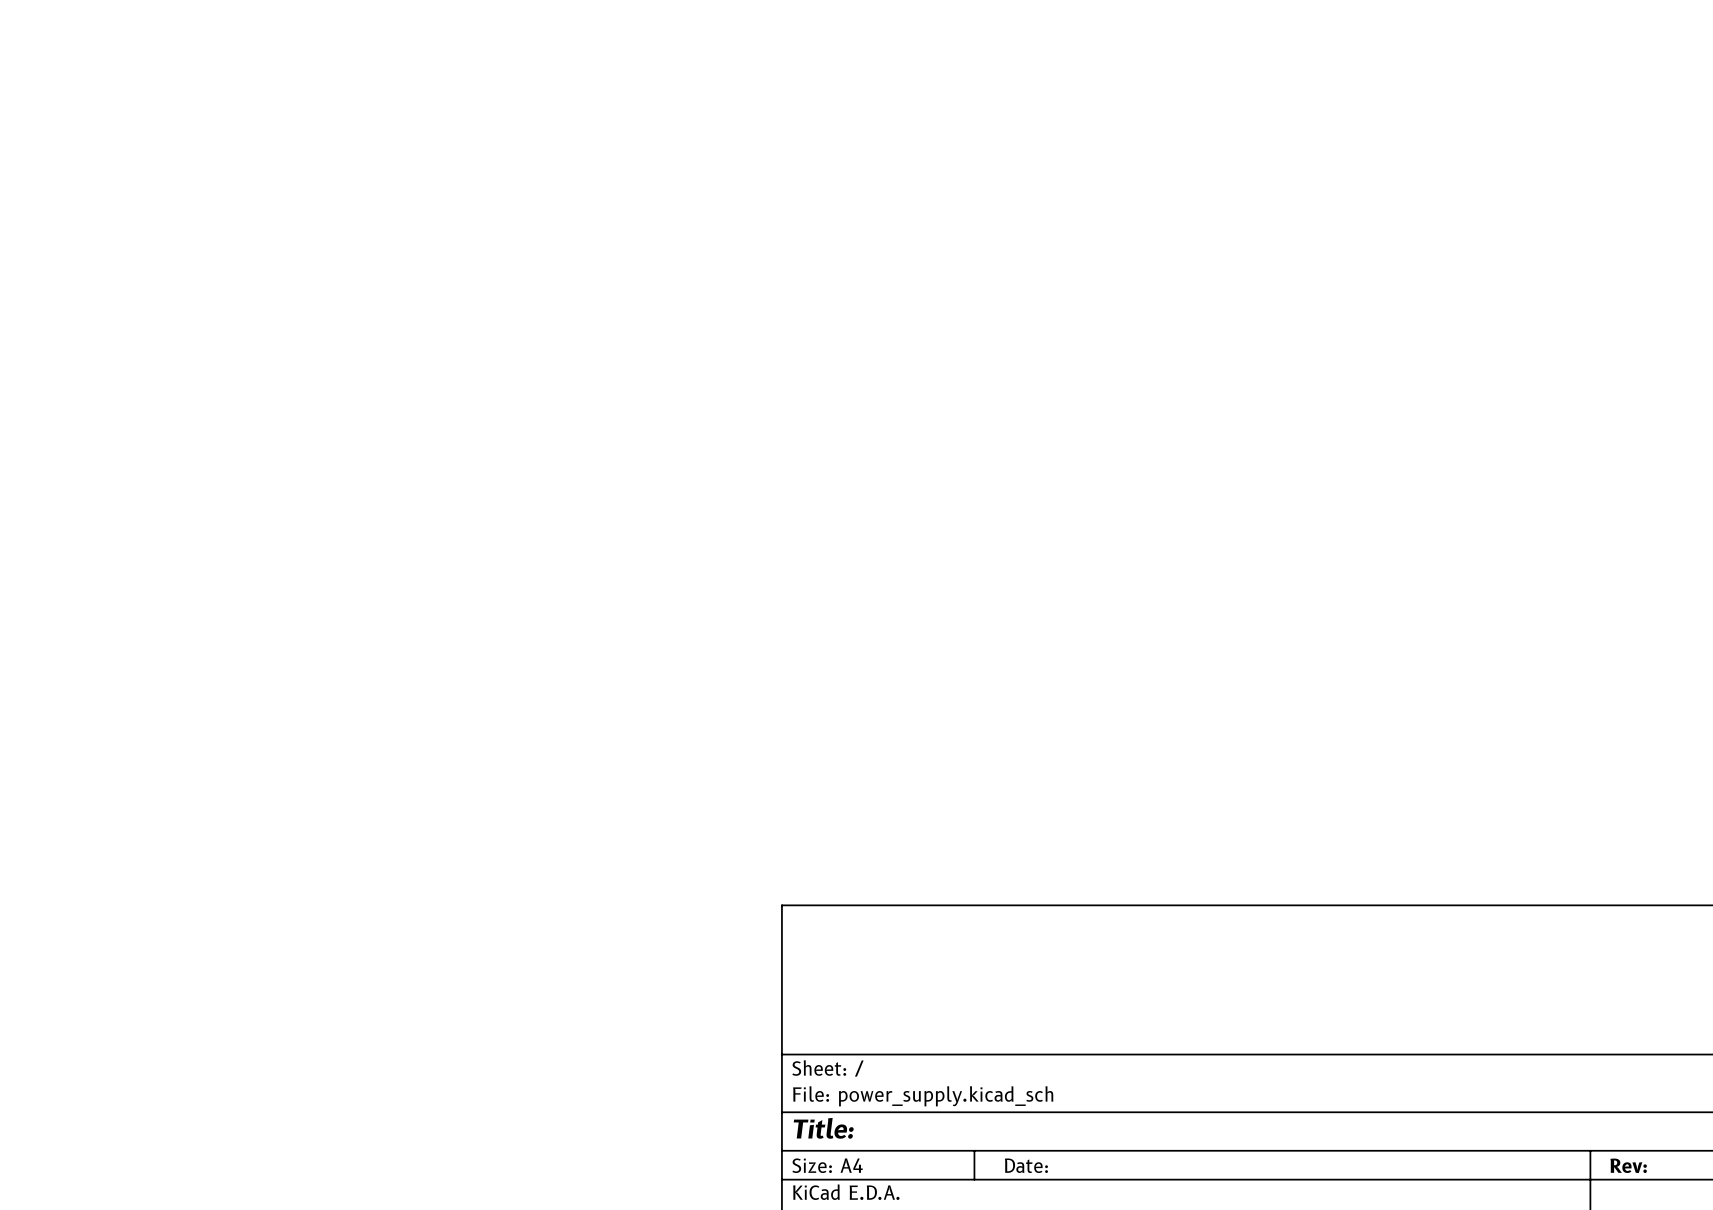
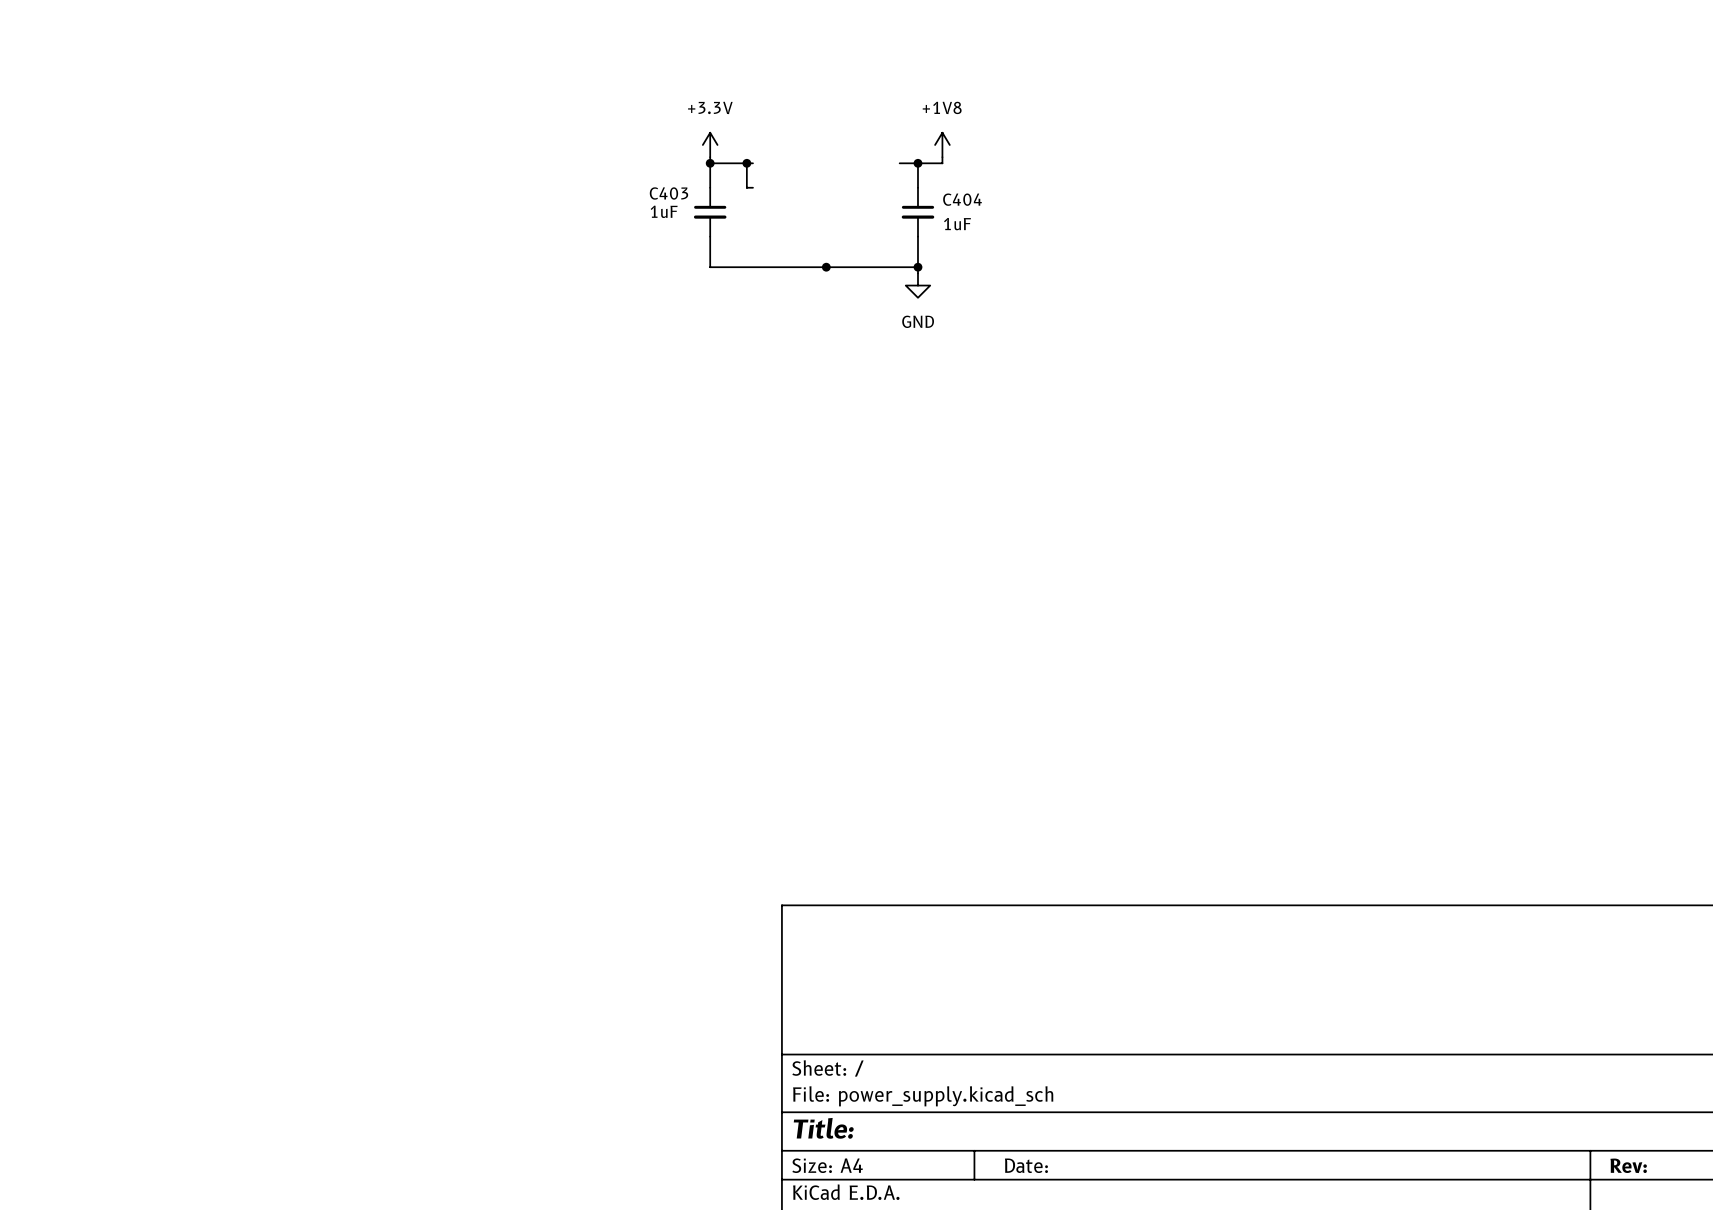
power symbol: none -> +3.3V (710, 144)
power symbol: none -> +1V8 (942, 144)
wire: none -> (710, 157) (710, 187)
wire: none -> (942, 157) (942, 163) (899, 163)
wire: none -> (710, 163) (752, 163)
junction: none -> (710, 163)
wire: none -> (746, 163) (746, 187) (752, 187)
junction: none -> (746, 163)
wire: none -> (917, 163) (917, 187)
junction: none -> (917, 163)
C403: none -> 1uF (710, 212)
C404: none -> 1uF (917, 212)
wire: none -> (710, 236) (710, 267) (917, 267)
wire: none -> (917, 236) (917, 273)
junction: none -> (826, 267)
junction: none -> (917, 267)
power symbol: none -> GND (917, 285)

